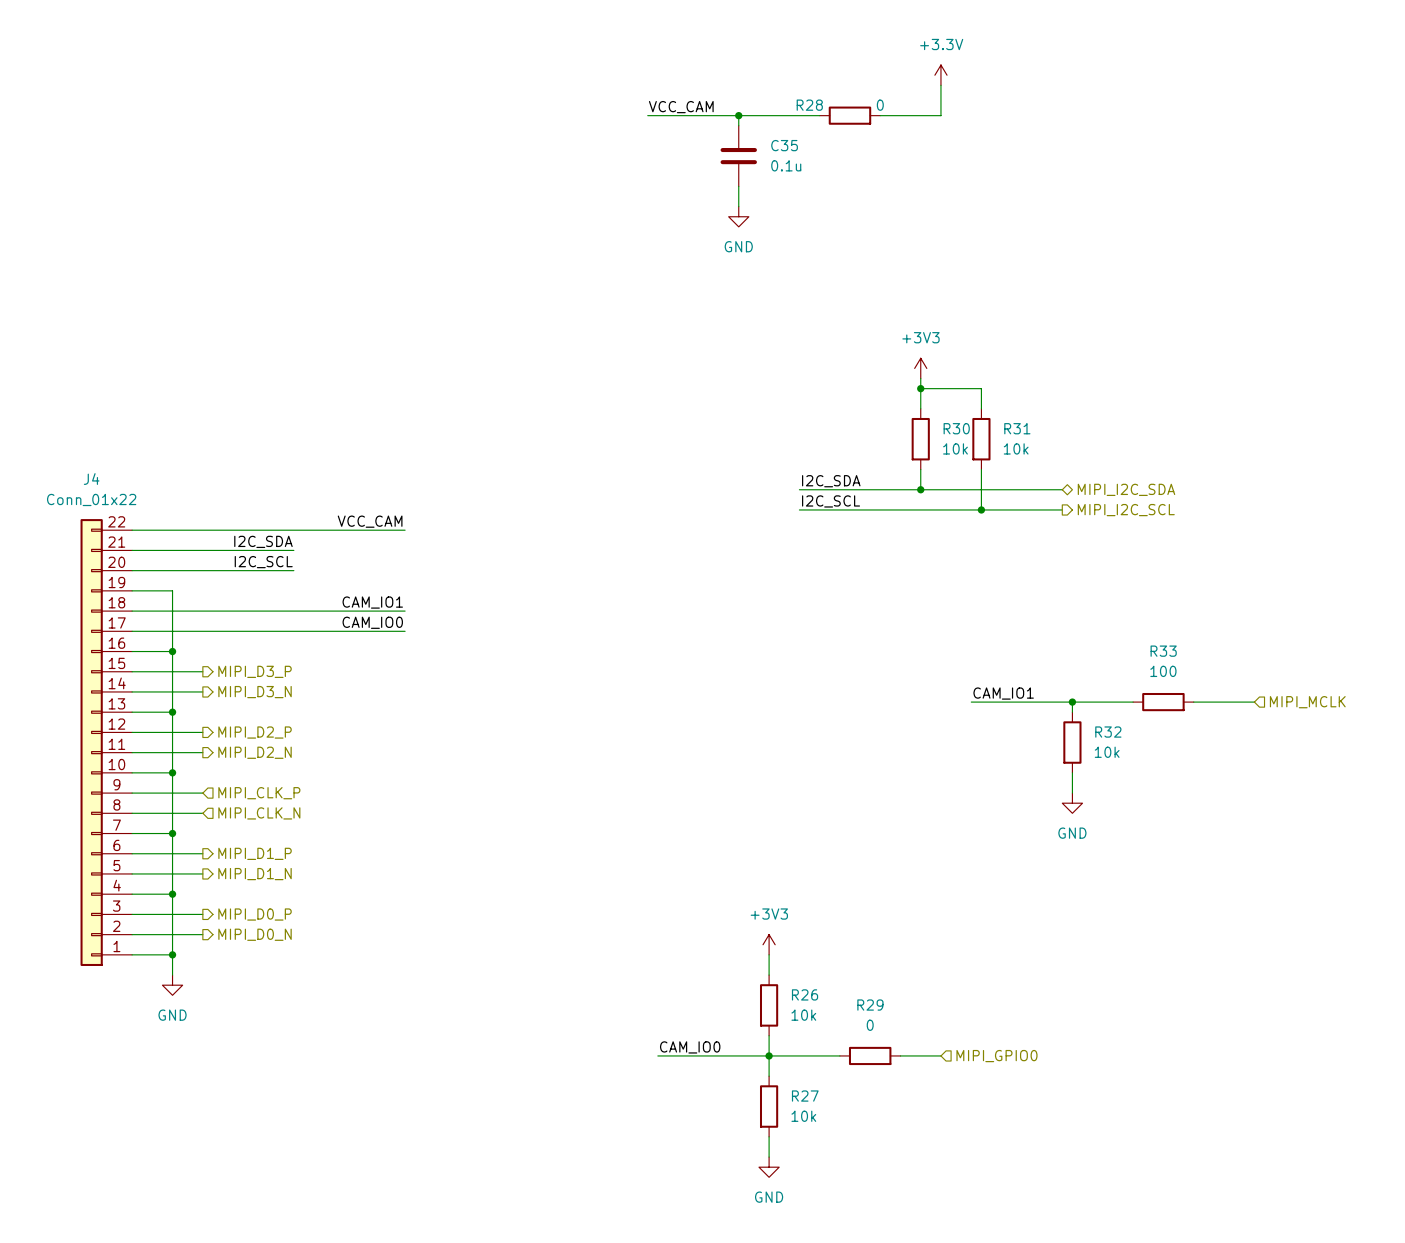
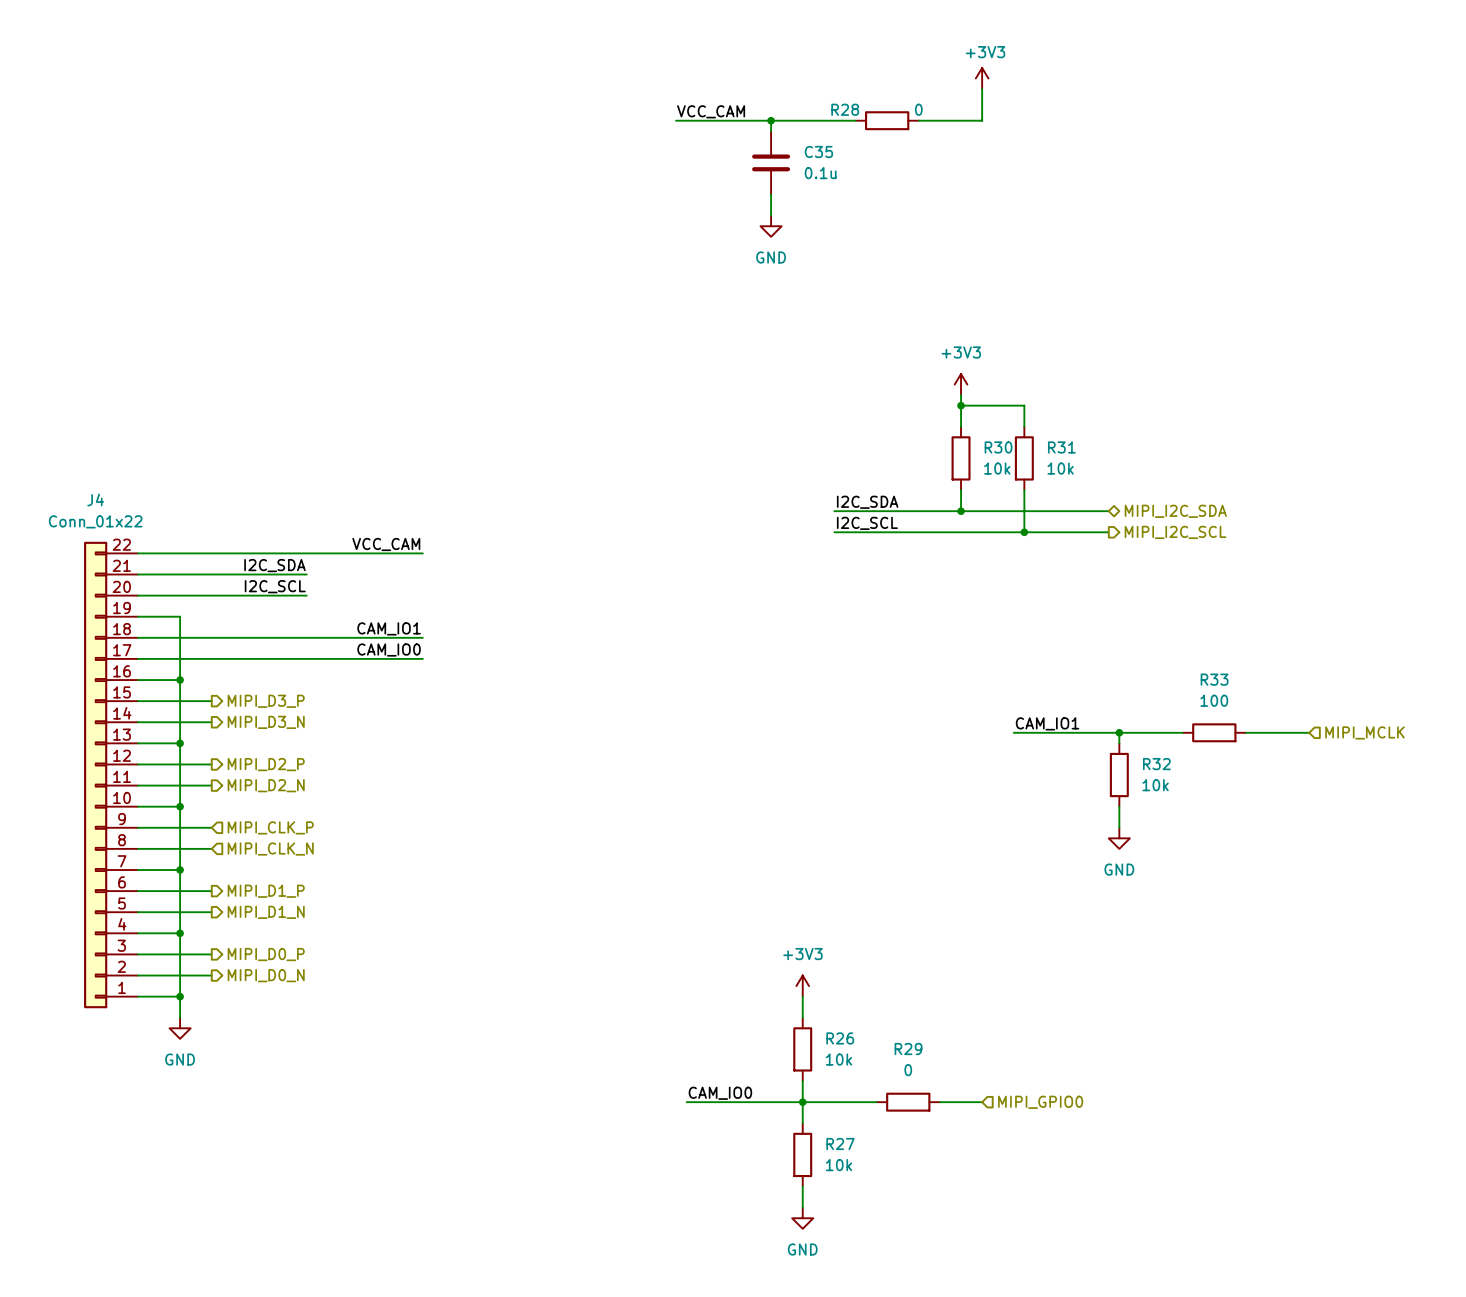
power symbol: +3.3V (940, 75) -> +3V3 (982, 78)

